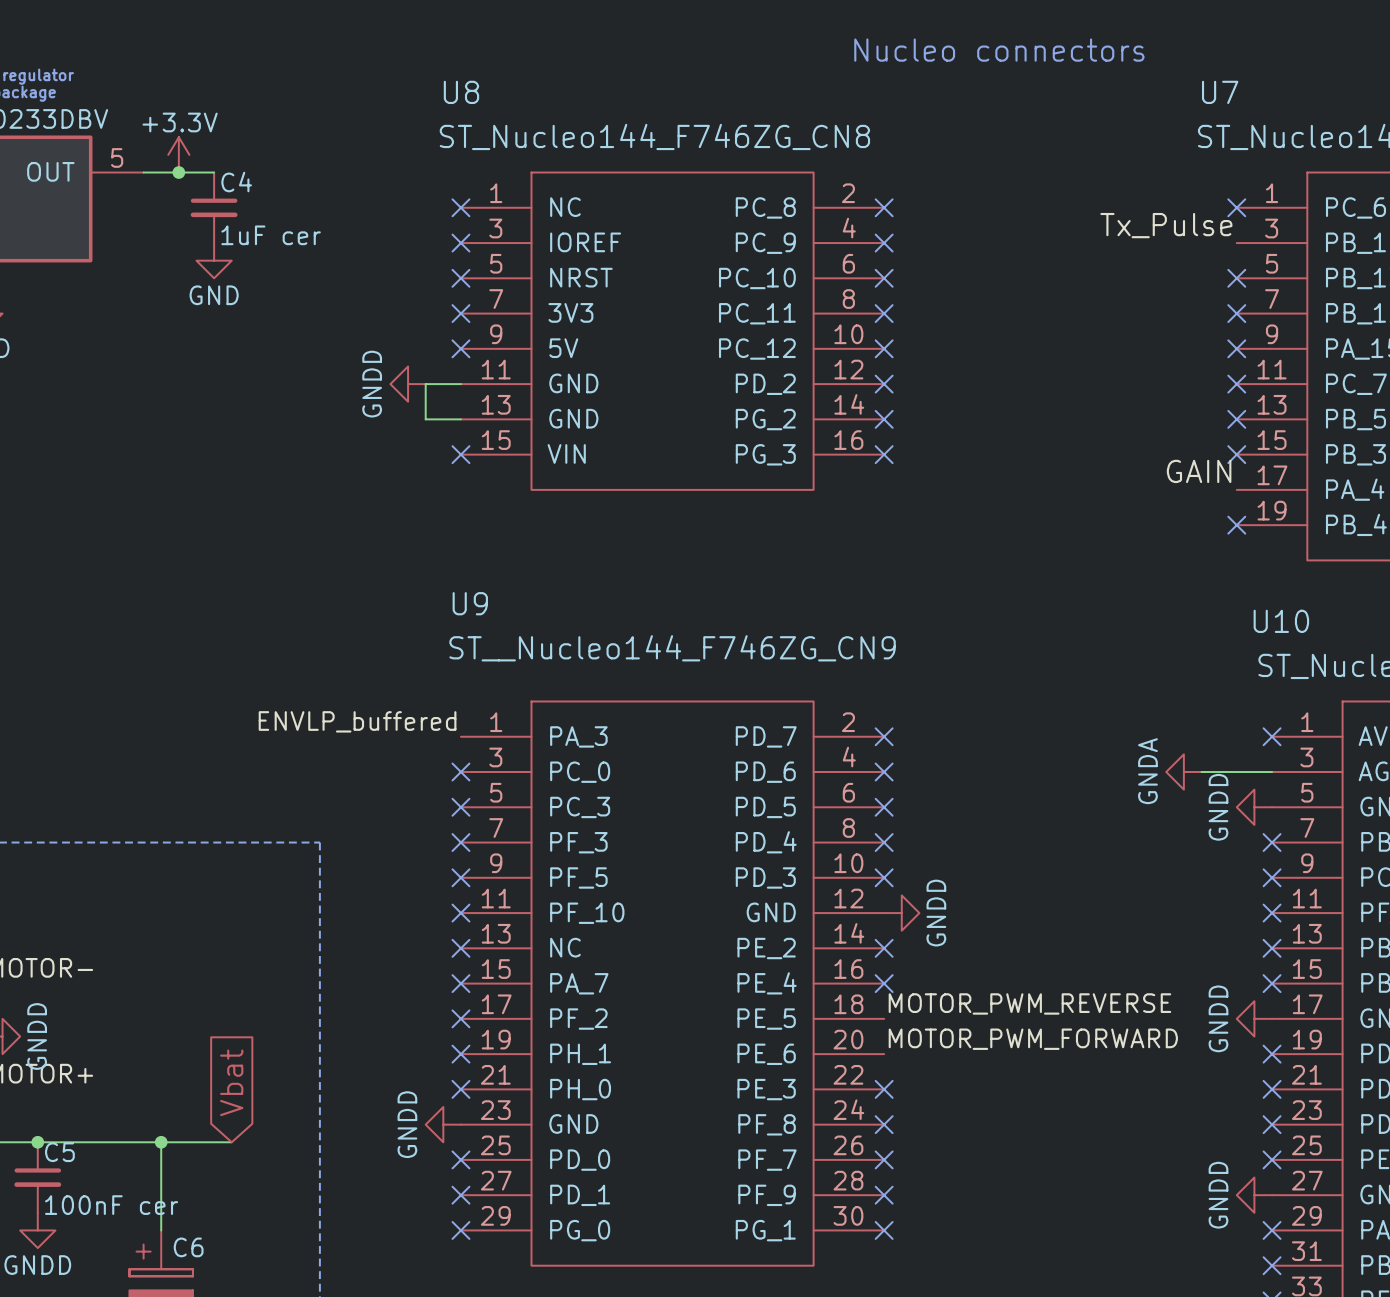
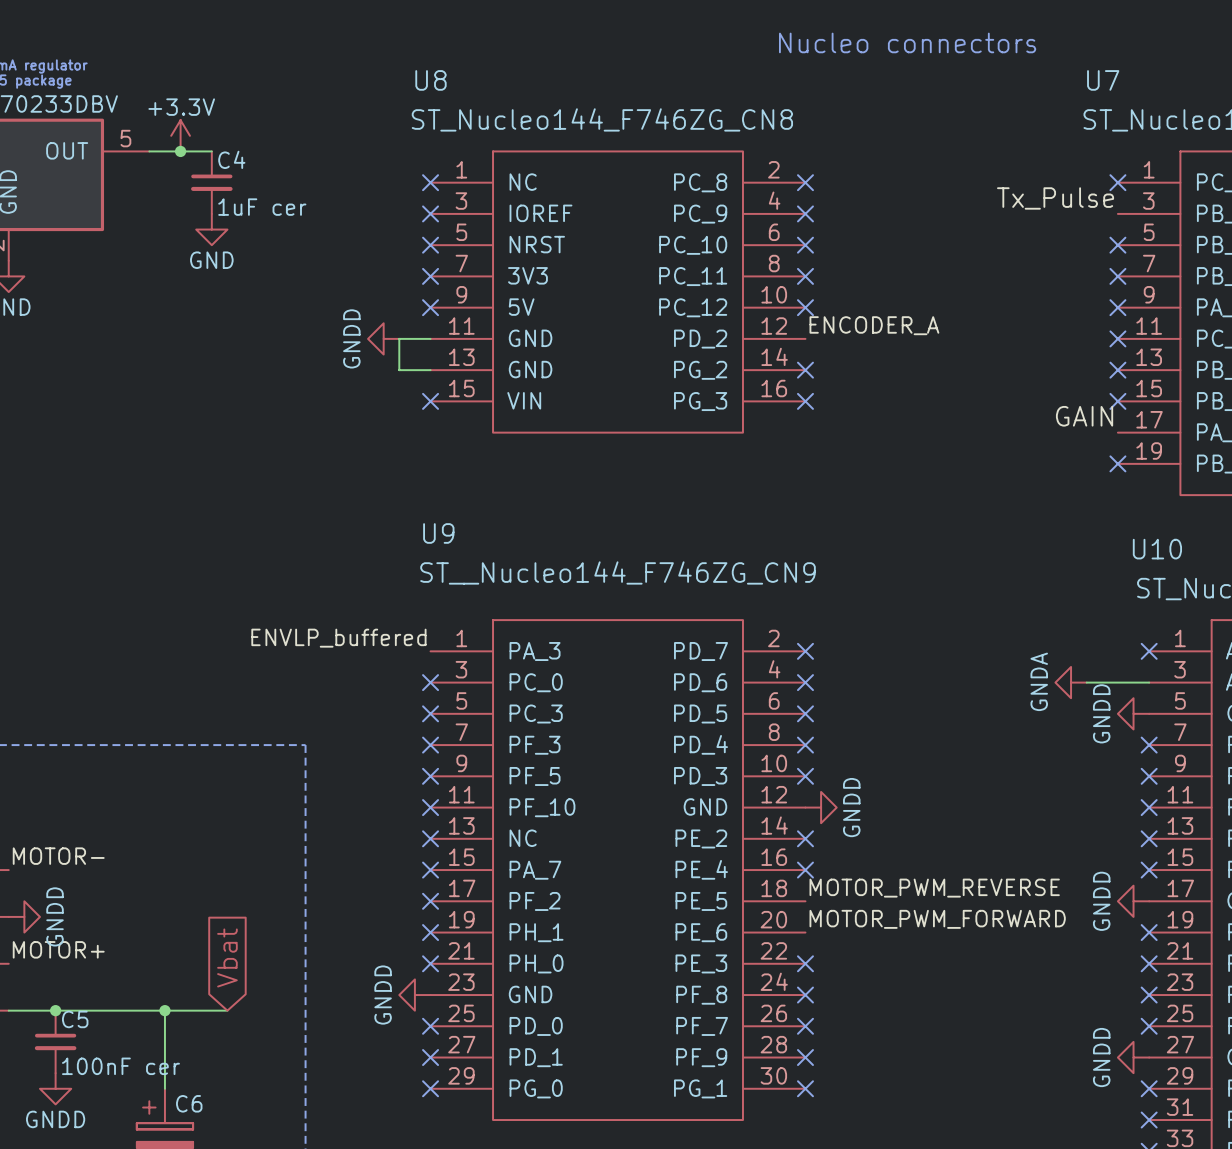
label: none -> ENCODER_A (874, 325)
no-connect mark: (884, 384) -> none

